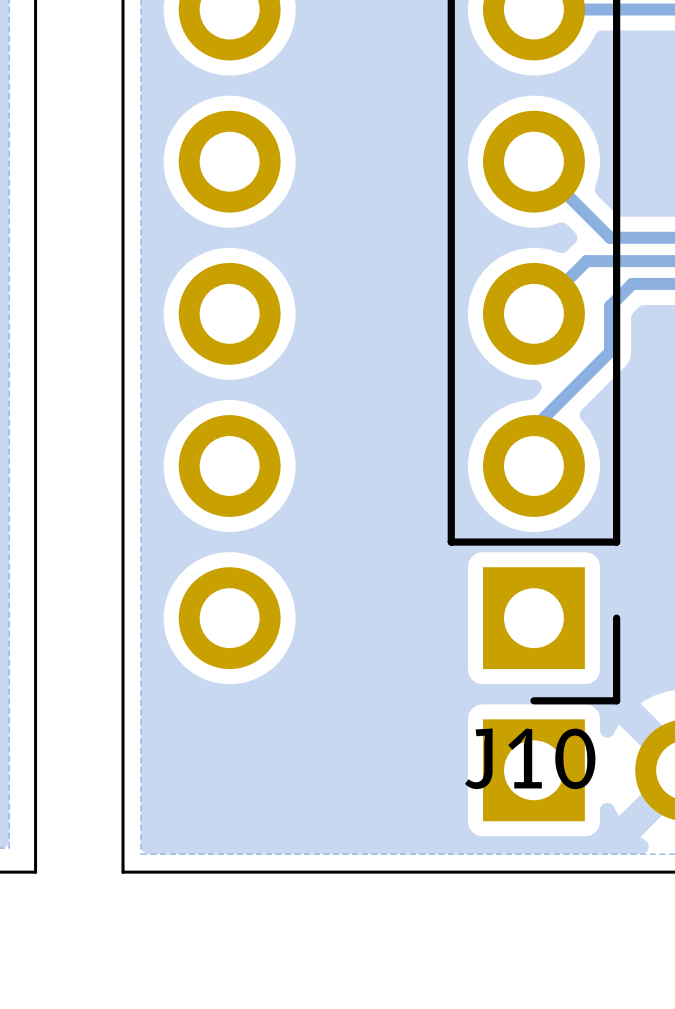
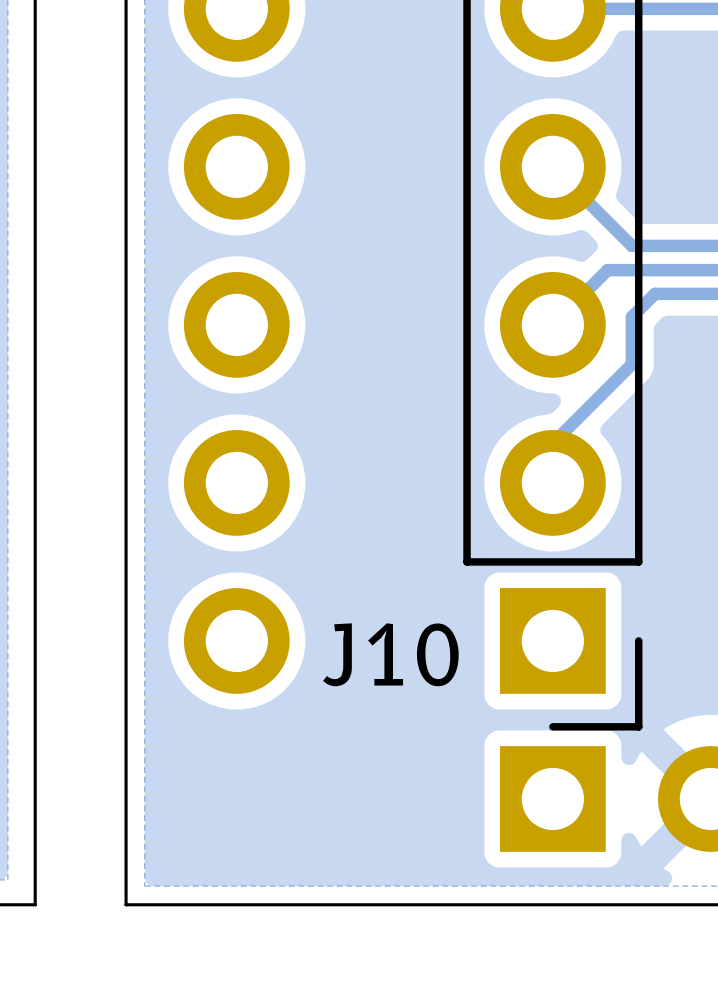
J10 name position: J10 (530, 758) -> J10 (390, 654)

